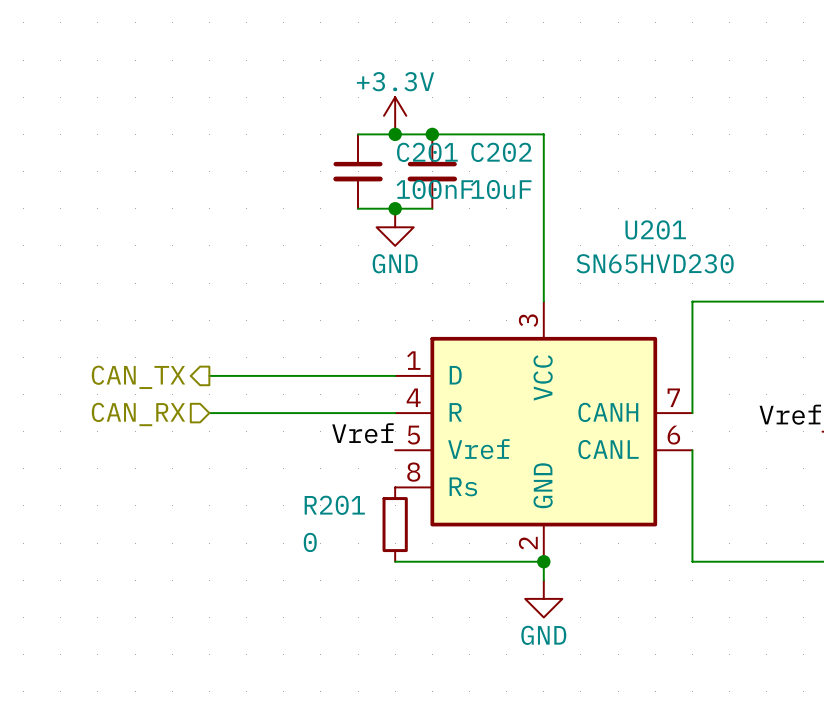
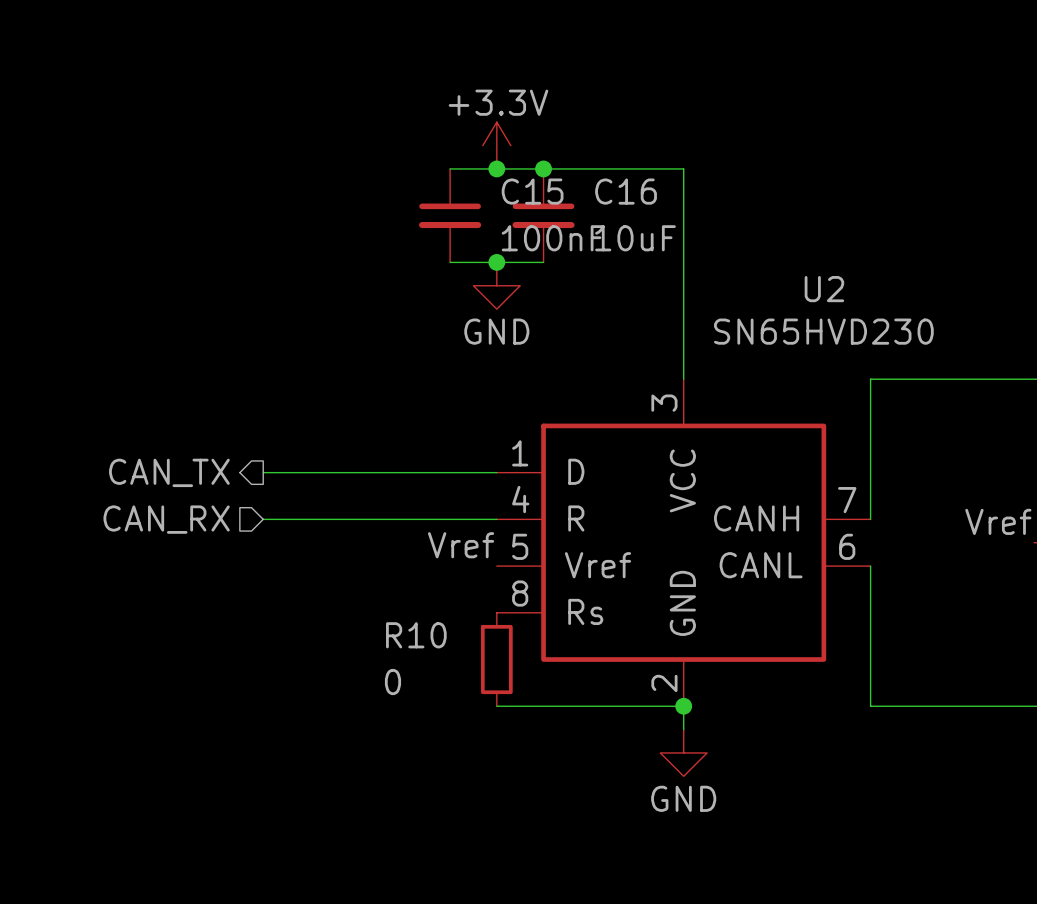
C201 name: C201 (427, 152) -> C15 (532, 191)
C202 name: C202 (501, 152) -> C16 (626, 191)
U201 name: U201 (655, 229) -> U2 (824, 289)
R201 name: R201 (334, 505) -> R10 (416, 635)

